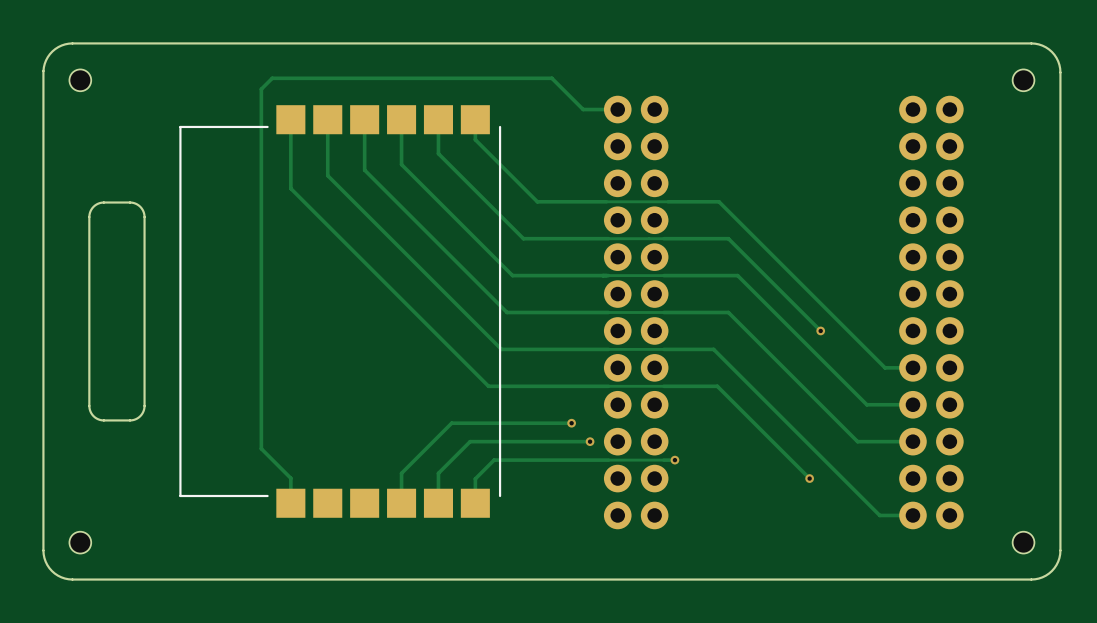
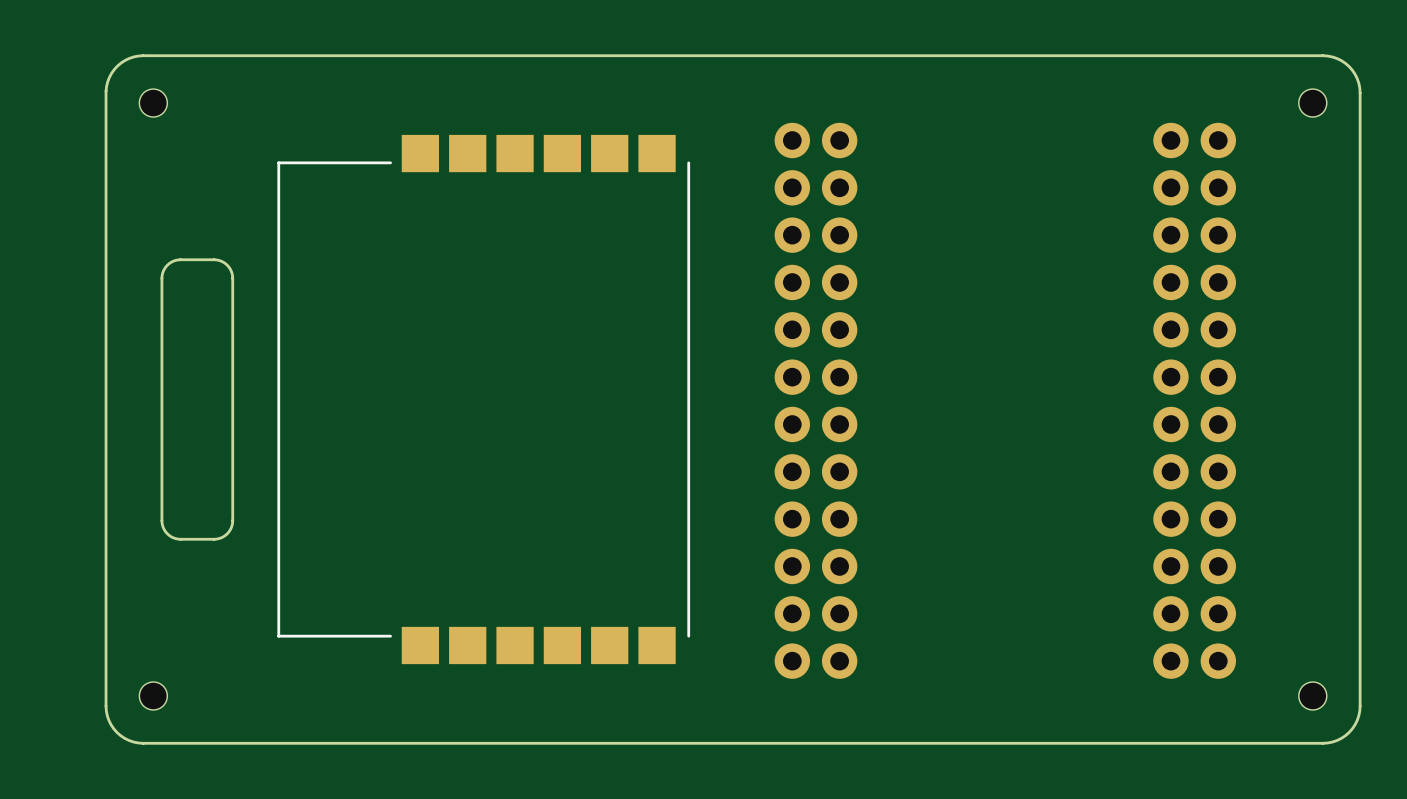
board edge: (111, 43) (72, 43) (61, 45) (49, 54) (43, 67) (43, 550) (49, 568) (61, 577) (72, 579) (111, 579) -> (143, 55) (129, 58) (117, 65) (109, 77) (106, 91) (106, 706) (108, 720) (116, 732) (129, 740) (143, 743)
part position: (80, 80) -> (153, 103)
track: (617, 109) (583, 109) (551, 78) (272, 78) (261, 89) (261, 448) (290, 478) (290, 495) -> none
track: (290, 126) (290, 188) (488, 386) (717, 386) (809, 478) -> none
track: (327, 126) (327, 175) (501, 349) (713, 349) (879, 515) (912, 515) -> none
track: (364, 126) (364, 170) (507, 312) (728, 312) (857, 441) (912, 441) -> none
track: (401, 126) (401, 164) (512, 275) (737, 275) (866, 404) (912, 404) -> none
track: (438, 126) (438, 153) (523, 238) (728, 238) (820, 330) -> none
track: (475, 126) (475, 139) (537, 201) (719, 201) (885, 367) (912, 367) -> none
board edge: (130, 202) (100, 203) (92, 208) (89, 215) (89, 405) (92, 414) (101, 420) (133, 419) (141, 414) (144, 407) (144, 215) (140, 206) (130, 202) -> (214, 259) (175, 260) (165, 267) (162, 275) (161, 520) (165, 531) (178, 539) (218, 538) (228, 531) (232, 523) (232, 275) (227, 265) (214, 259)
part position: (340, 311) -> (483, 399)
via: (820, 330) -> none
track: (571, 423) (451, 423) (401, 473) (401, 495) -> none
via: (571, 423) -> none
track: (590, 441) (470, 441) (438, 473) (438, 495) -> none
via: (590, 441) -> none
track: (674, 460) (494, 460) (475, 478) (475, 495) -> none
via: (674, 460) -> none
via: (809, 478) -> none
part position: (80, 542) -> (153, 695)

